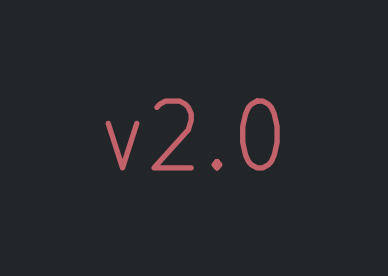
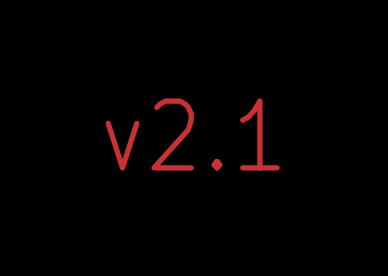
text: v2.0 (192, 134) -> v2.1 (192, 134)

